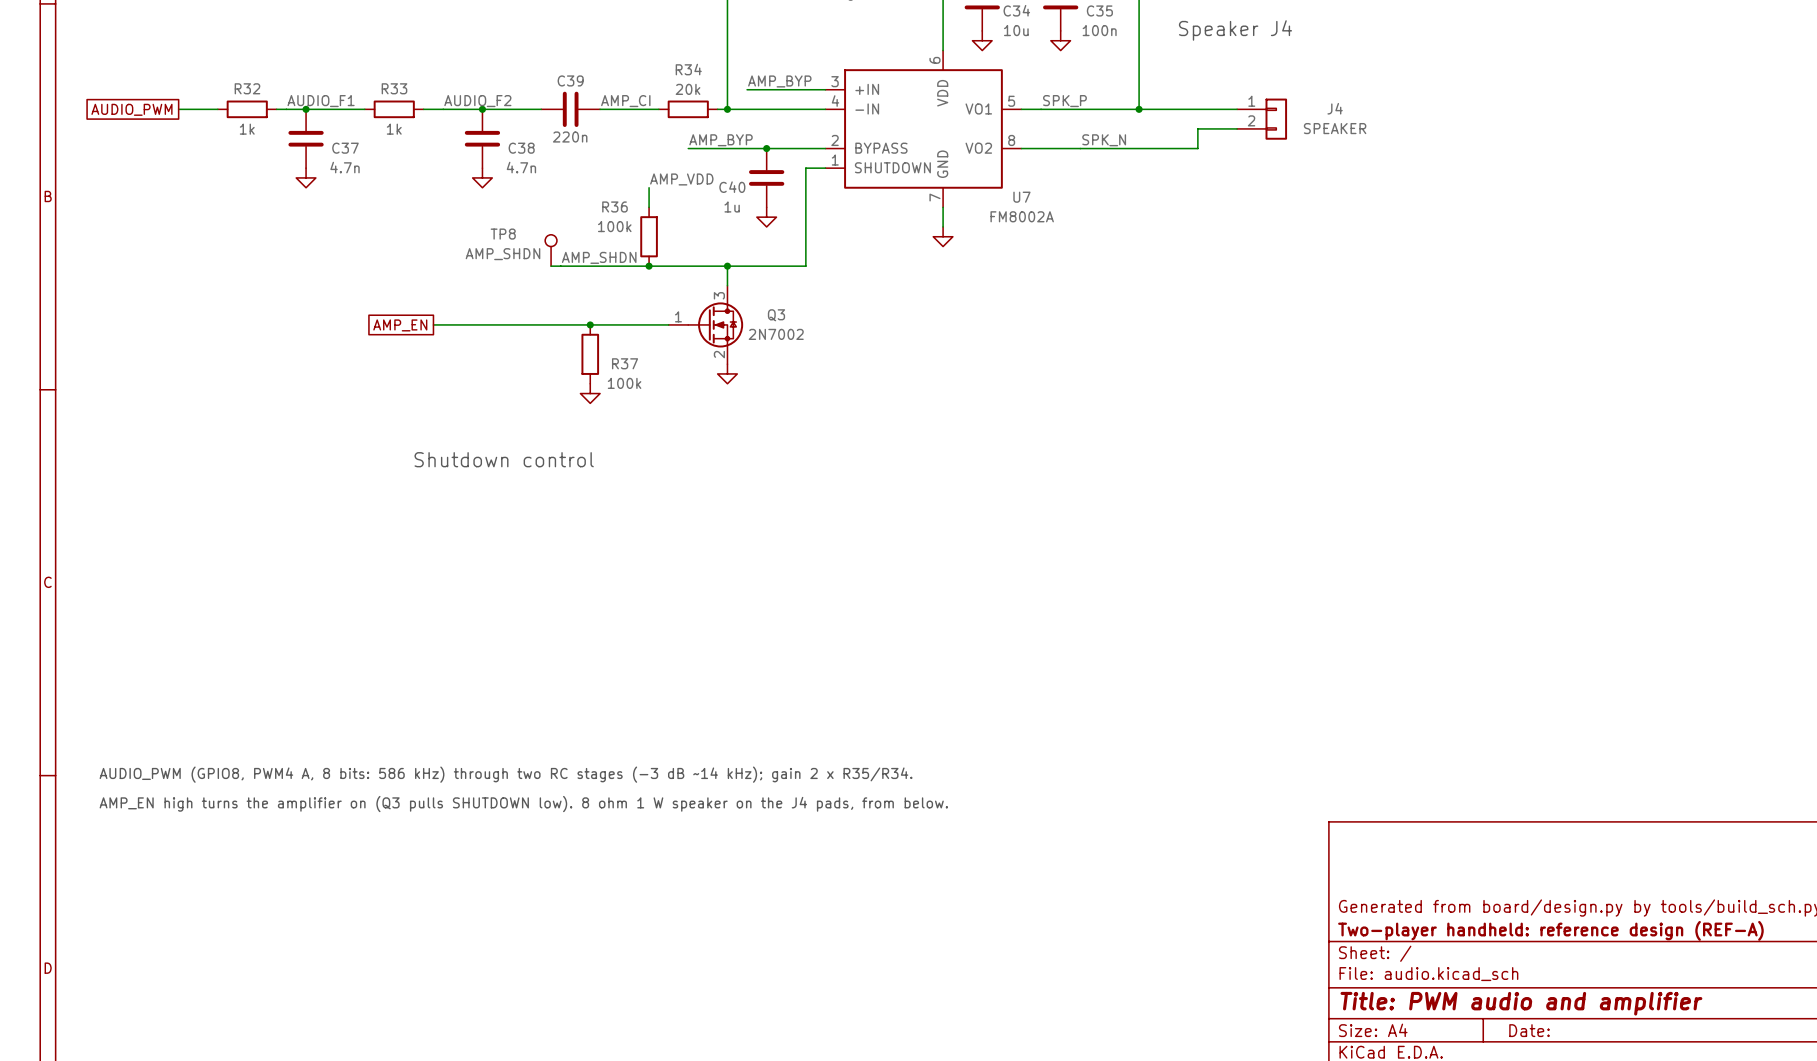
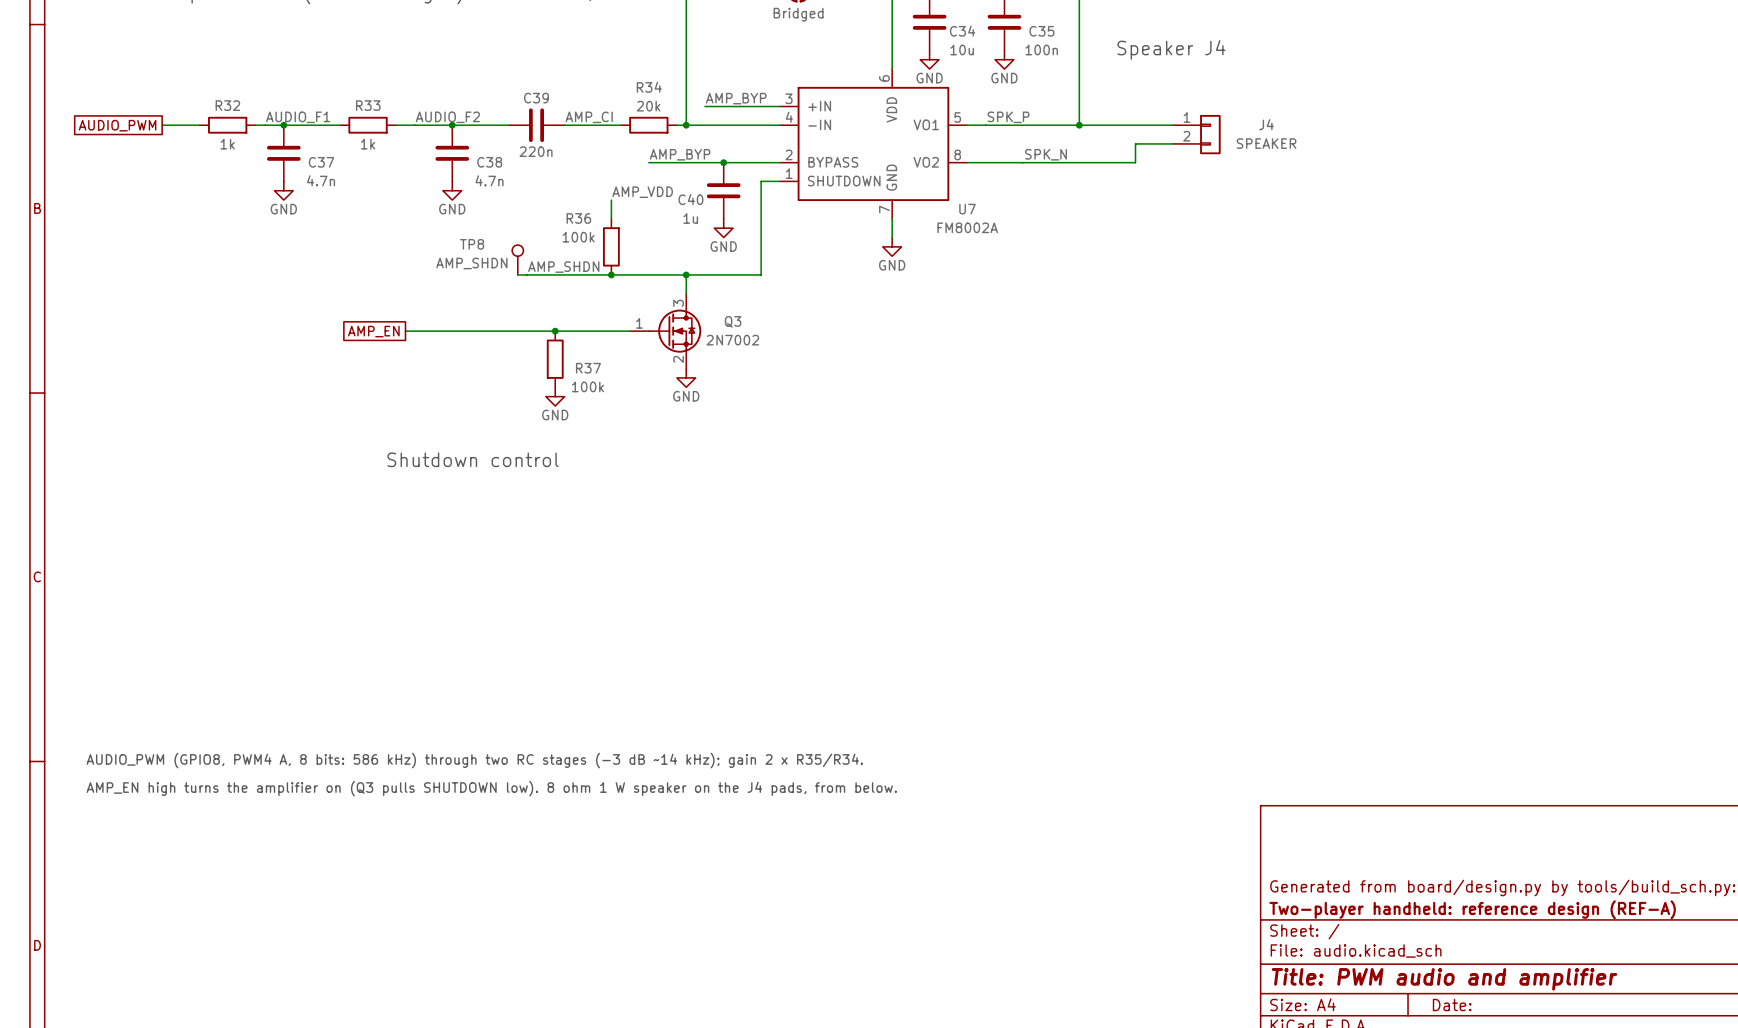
power symbol text: none -> GND (929, 78)
power symbol text: none -> GND (1004, 78)
power symbol text: none -> GND (283, 209)
power symbol text: none -> GND (452, 209)
power symbol text: none -> GND (723, 246)
power symbol text: none -> GND (892, 265)
power symbol text: none -> GND (686, 396)
power symbol text: none -> GND (555, 415)

